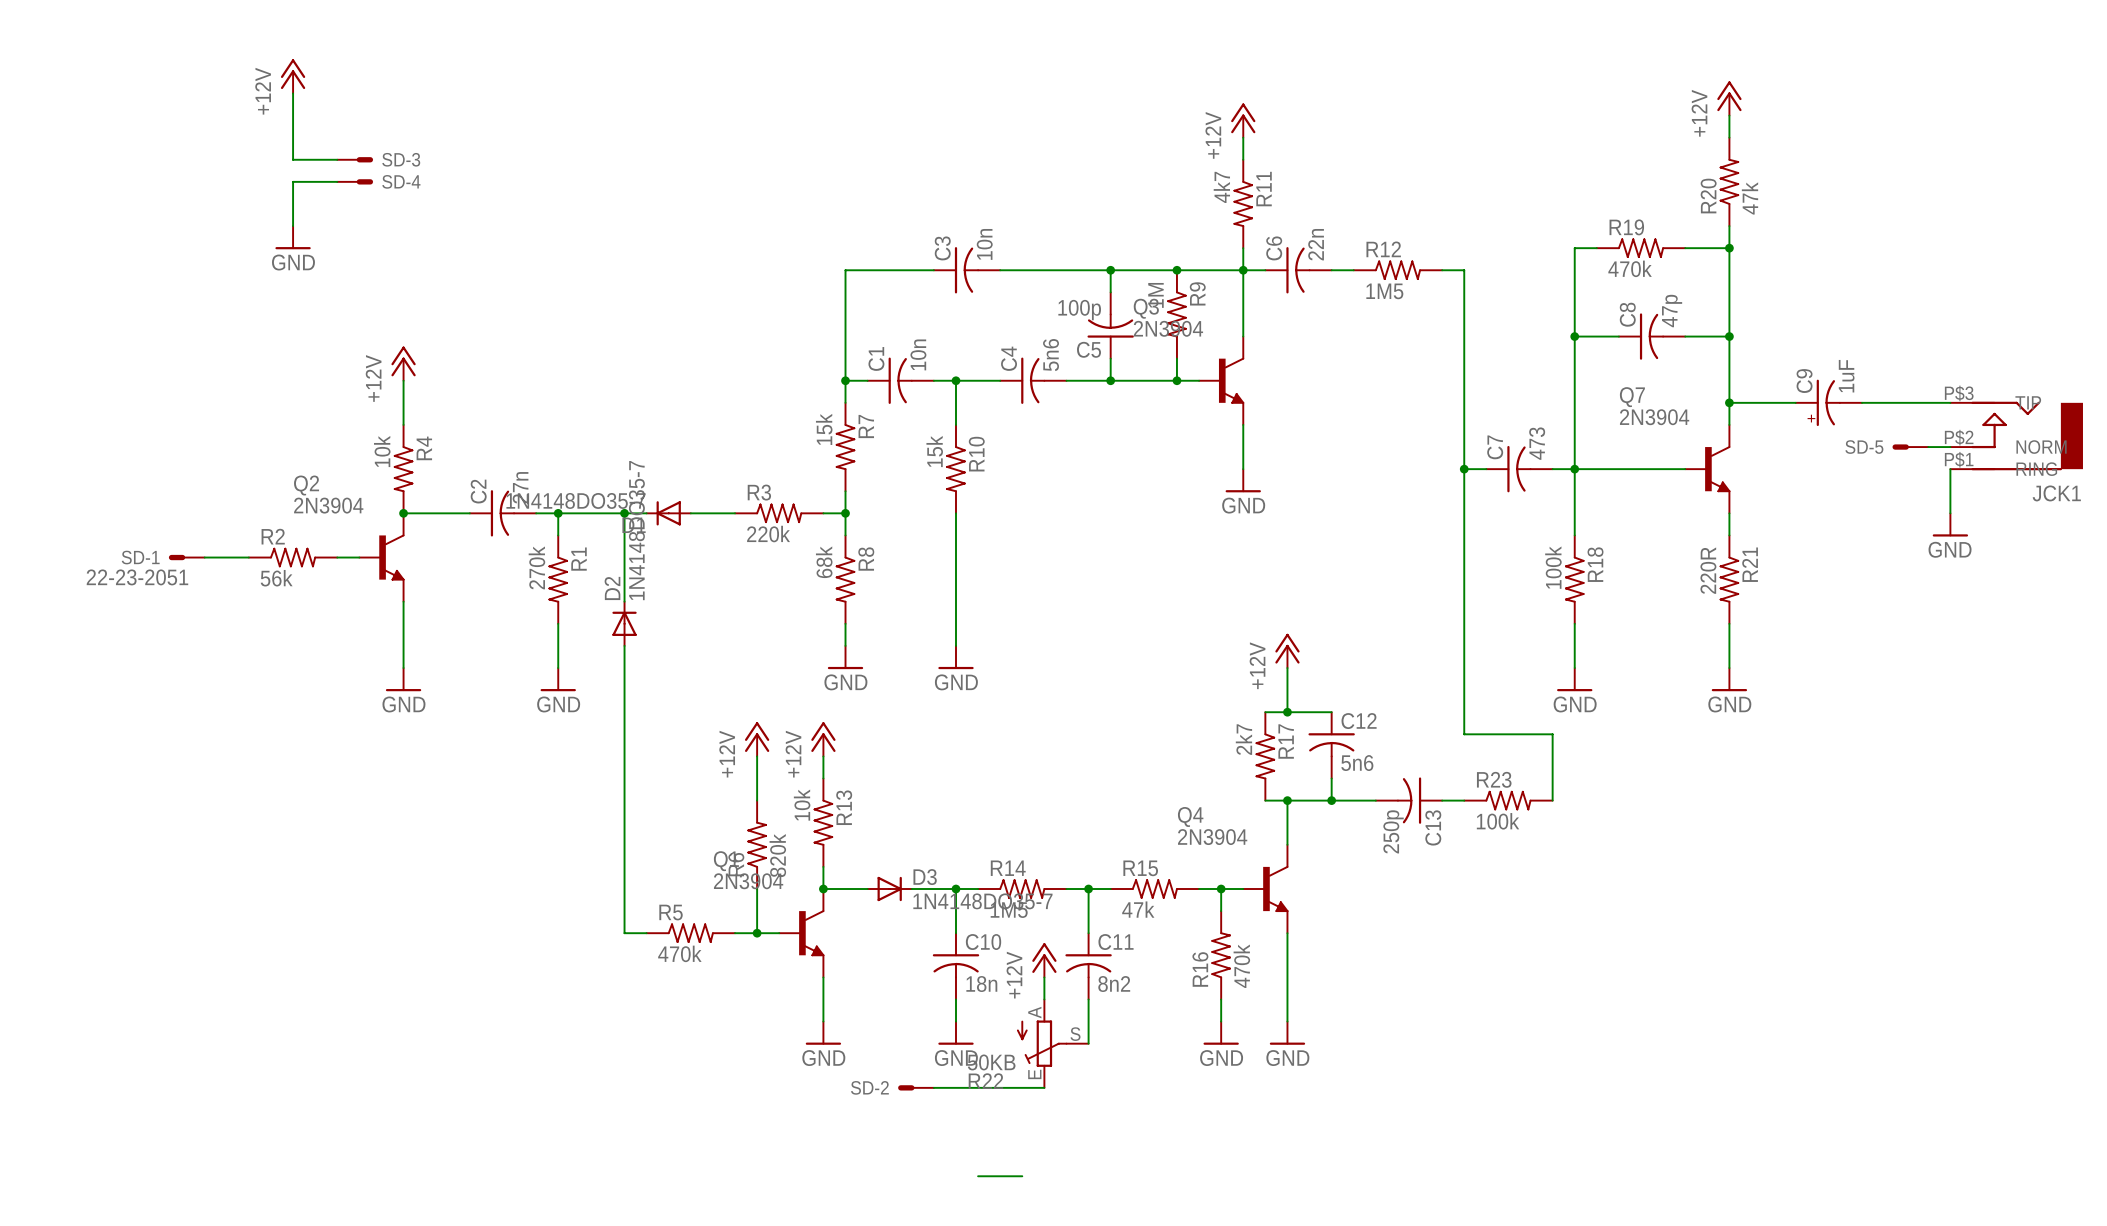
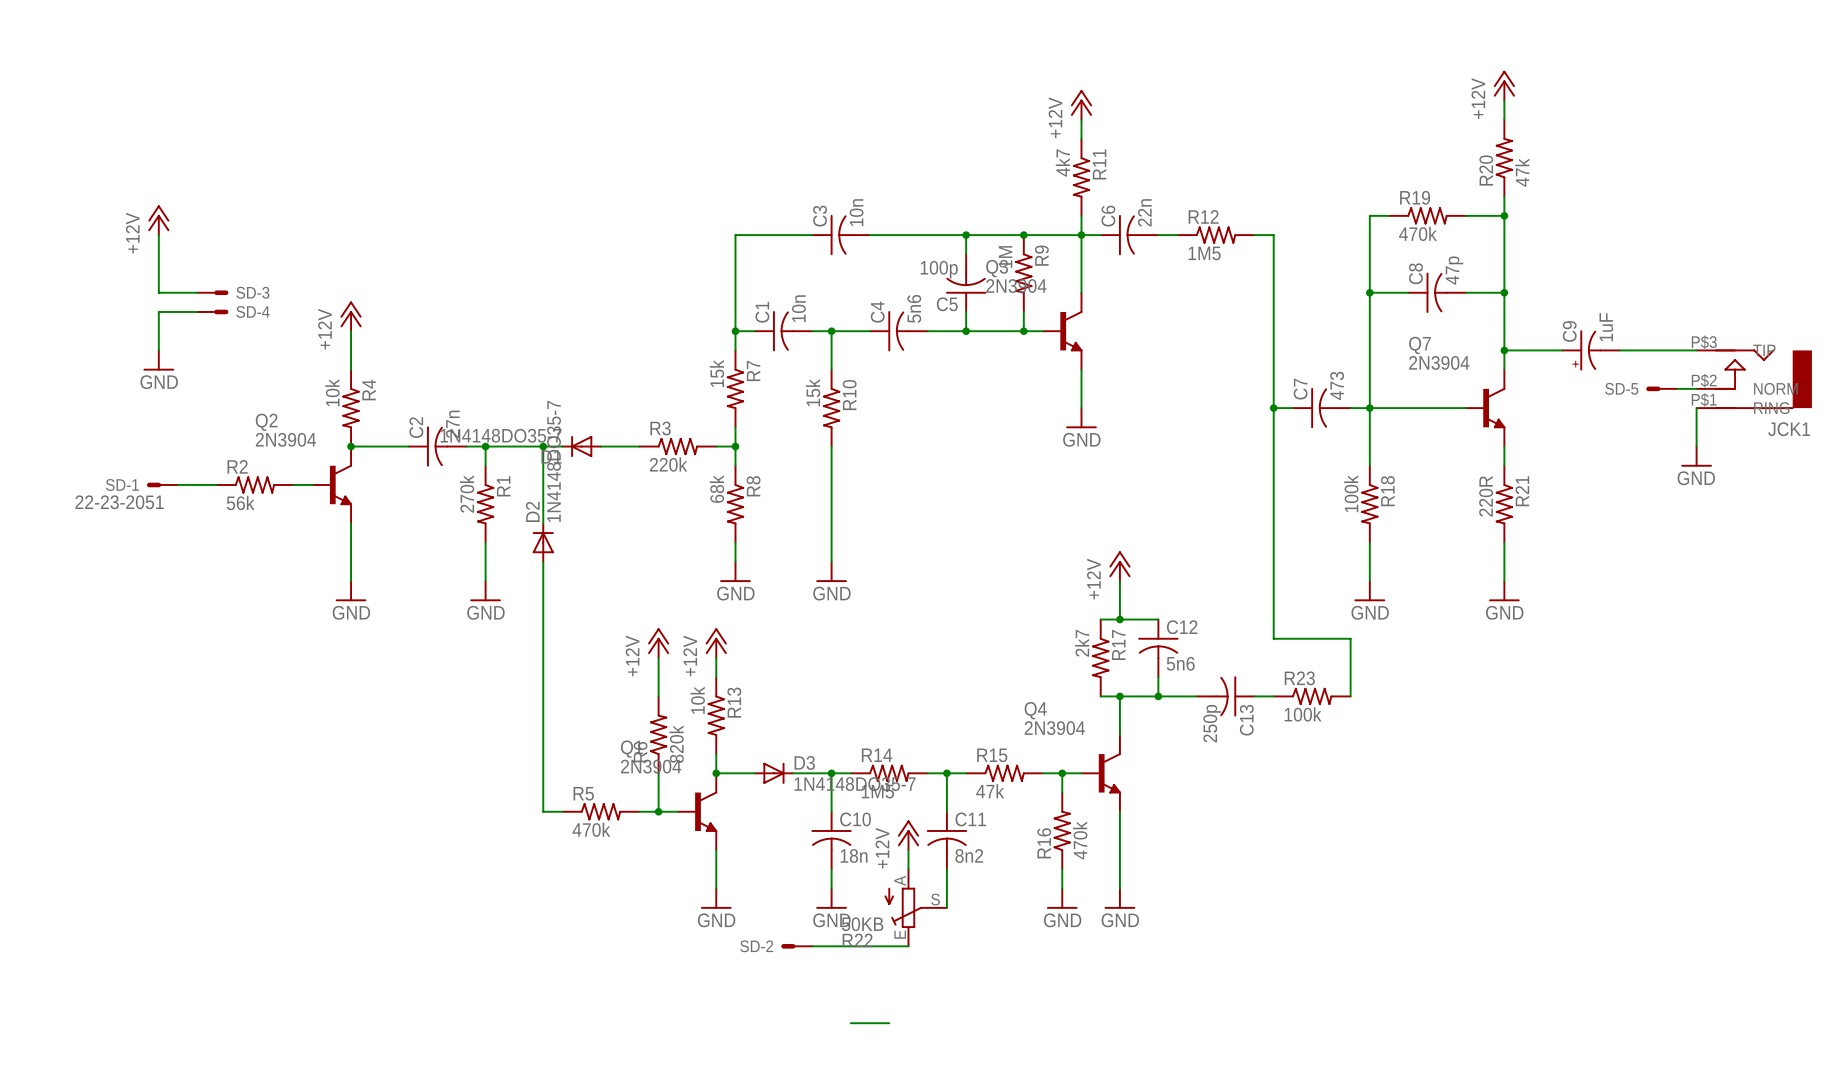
power symbol position: +12V (293, 76) -> +12V (158, 220)
wire: (293, 93) (293, 159) (337, 159) -> (158, 235) (158, 292) (197, 292)
SD-3 position: (355, 159) -> (212, 292)
wire: (337, 181) (293, 181) (293, 226) -> (197, 311) (158, 311) (158, 350)
SD-4 position: (355, 181) -> (212, 311)
power symbol position: GND (293, 237) -> GND (158, 360)

